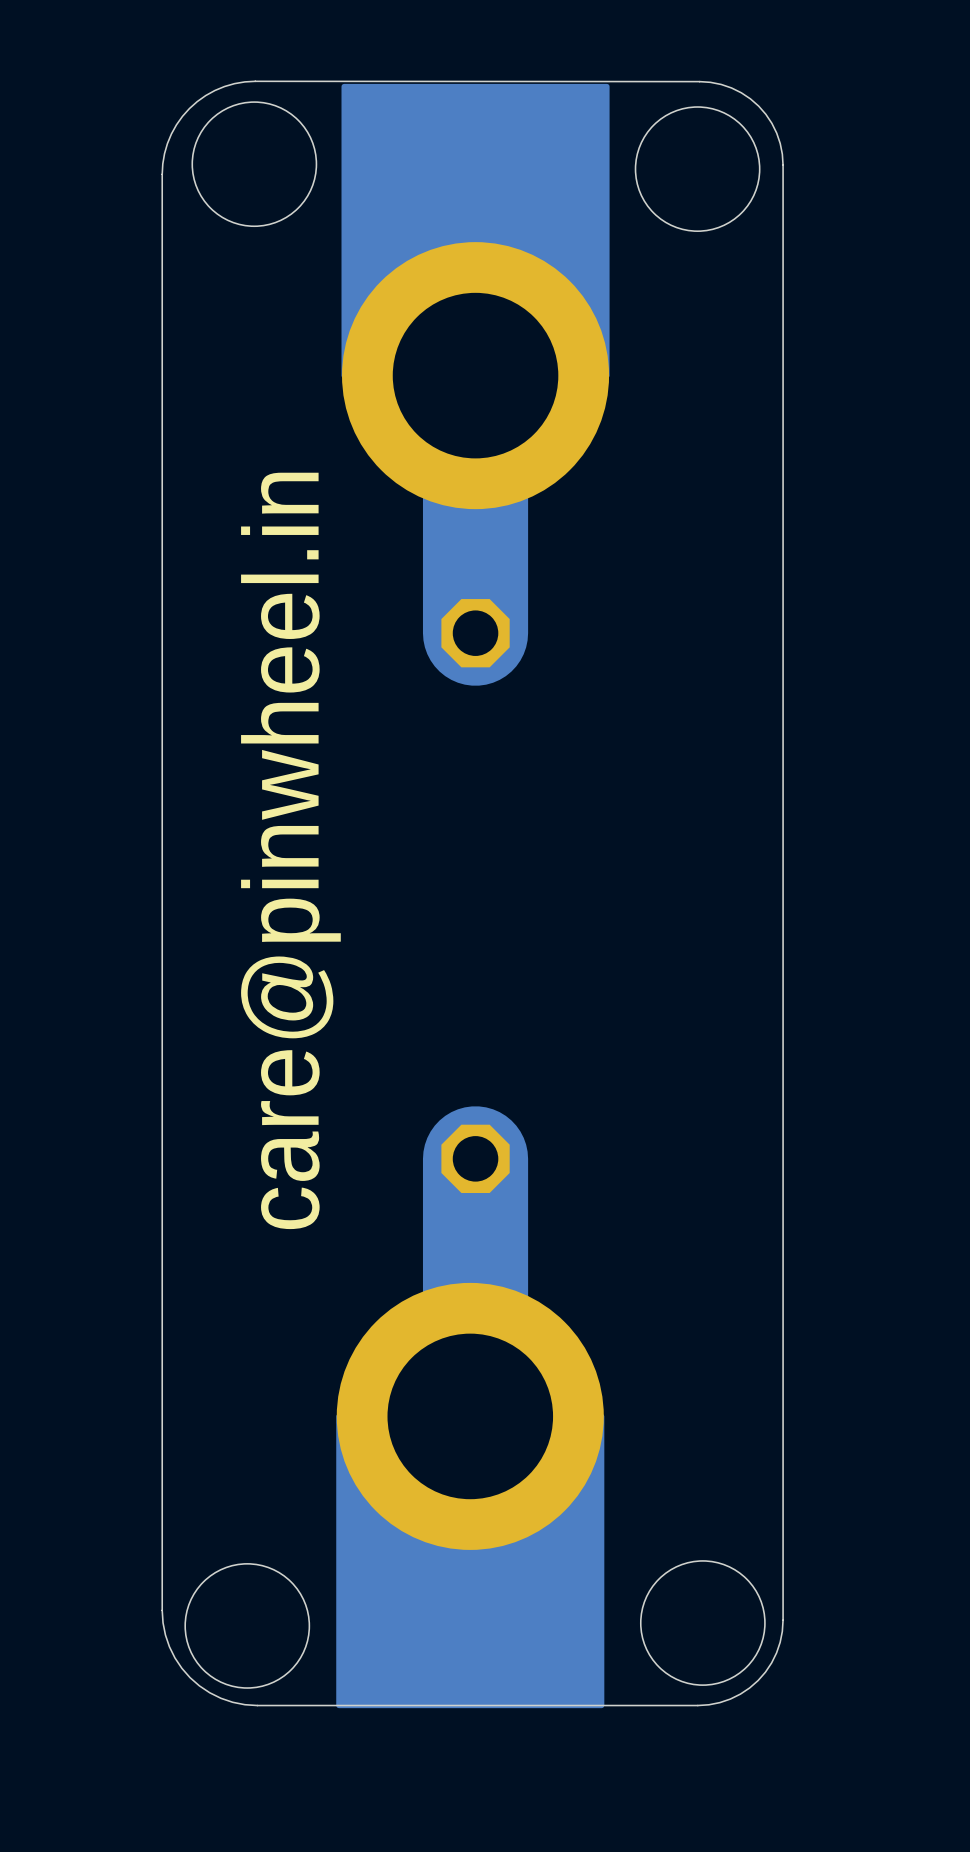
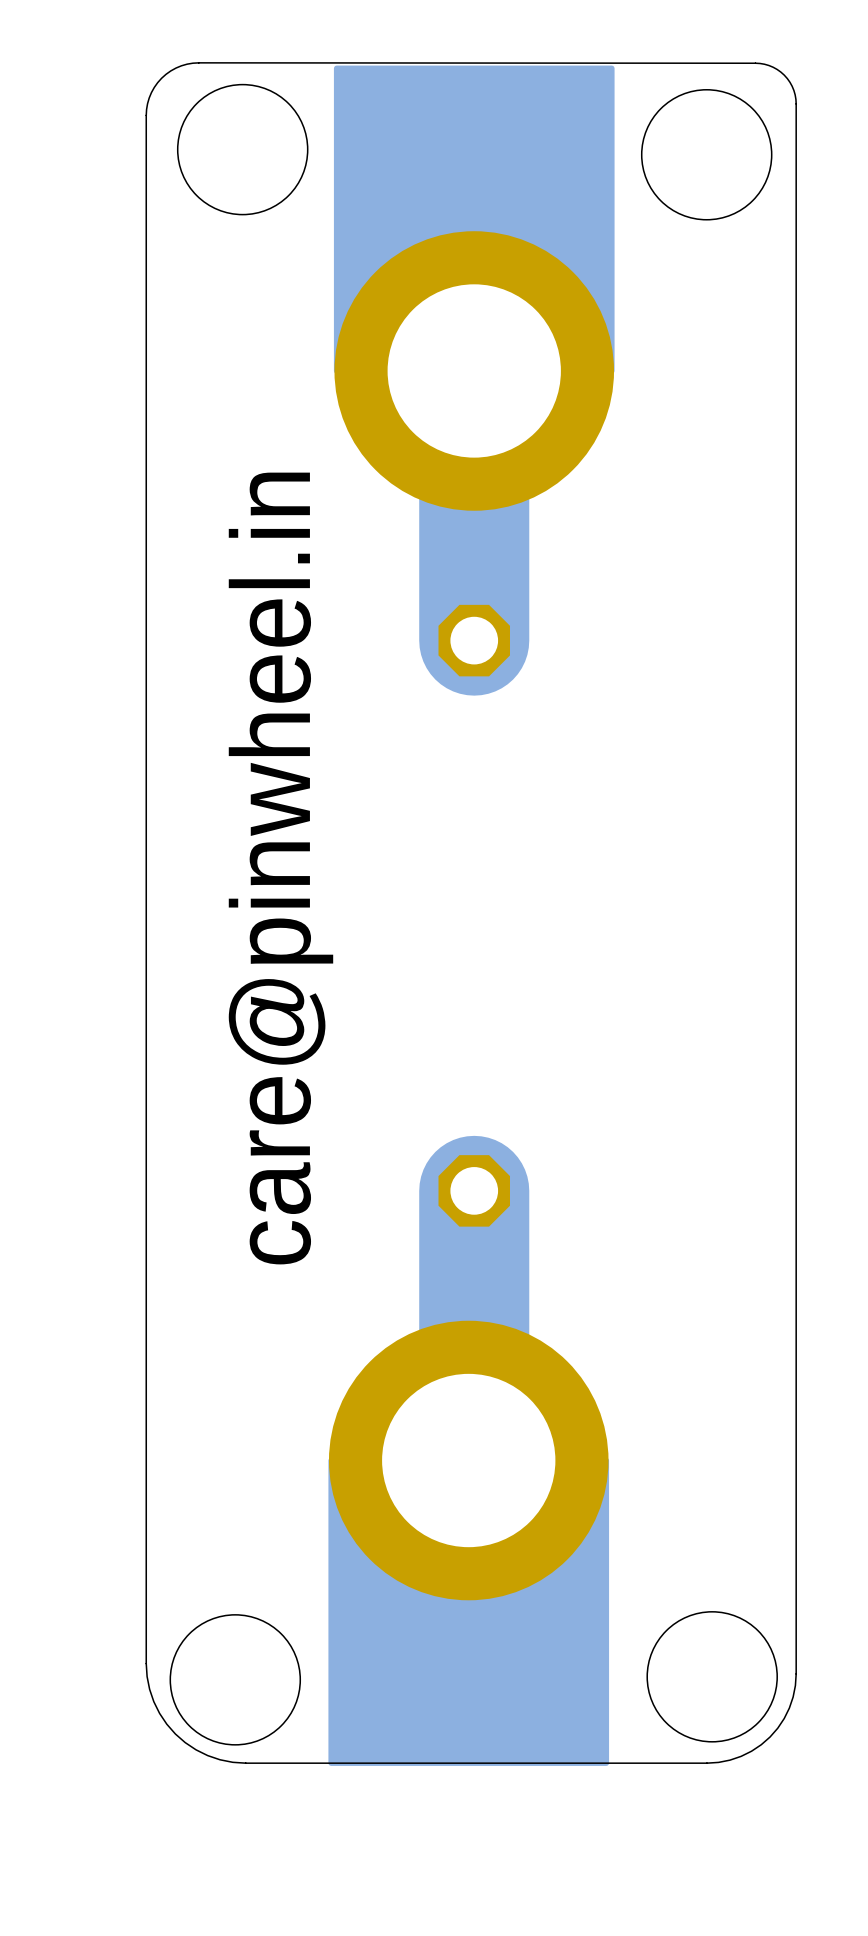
board edge: (255, 81) (224, 86) (205, 95) (189, 108) (176, 124) (167, 143) (162, 174) -> (243, 62) (187, 64) (170, 70) (161, 78) (151, 92) (147, 103) (146, 160)
board edge: (699, 81) (731, 87) (758, 106) (776, 133) (783, 165) -> (708, 63) (760, 63) (773, 67) (784, 75) (792, 86) (795, 99) (796, 150)

